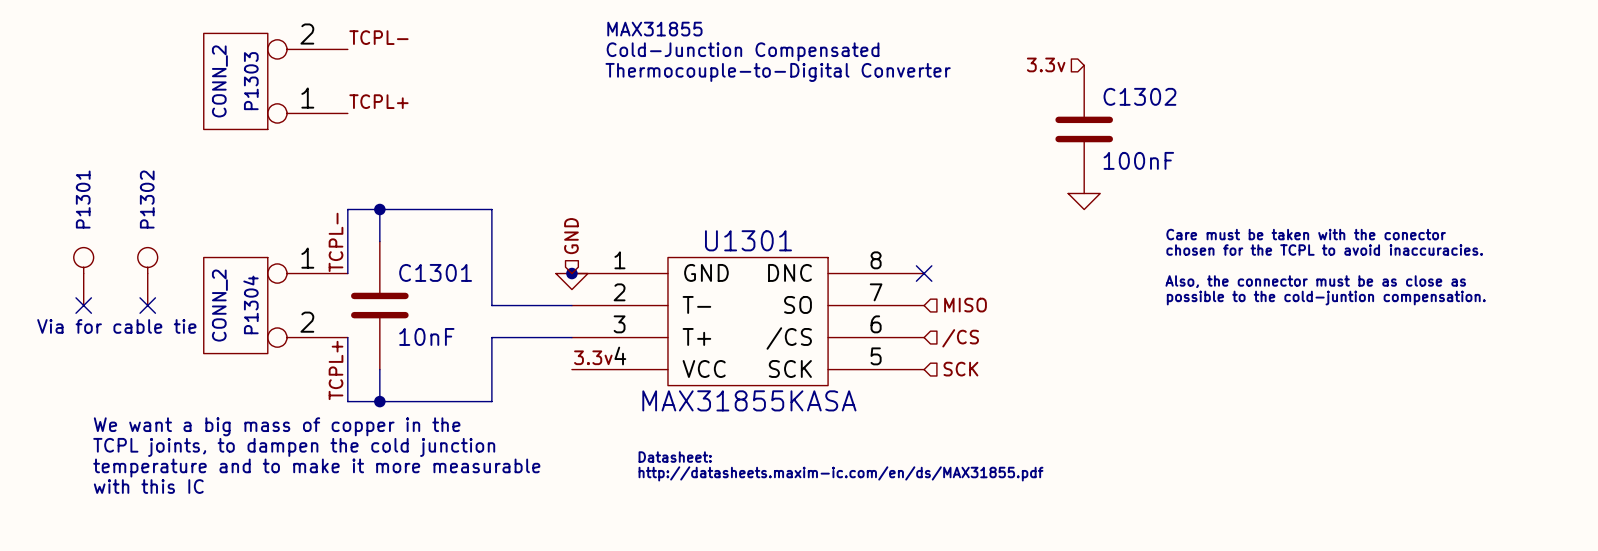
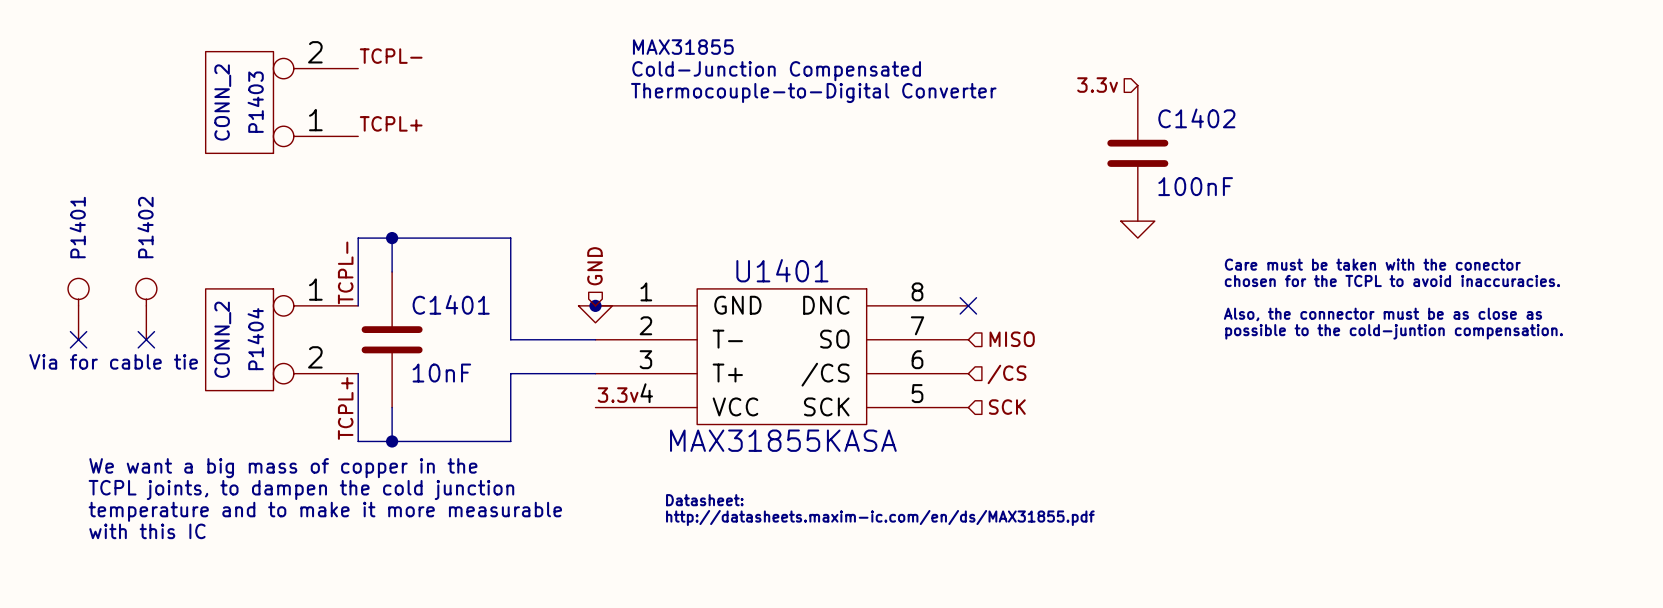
P1303 name: P1303 (251, 81) -> P1403 (255, 102)
C1302 name: C1302 (1139, 96) -> C1402 (1196, 118)
P1301 name: P1301 (83, 199) -> P1401 (77, 227)
P1302 name: P1302 (147, 199) -> P1402 (145, 227)
U1301 name: U1301 (748, 240) -> U1401 (782, 270)
C1301 name: C1301 (435, 272) -> C1401 (451, 304)
P1304 name: P1304 (250, 304) -> P1404 (255, 339)

